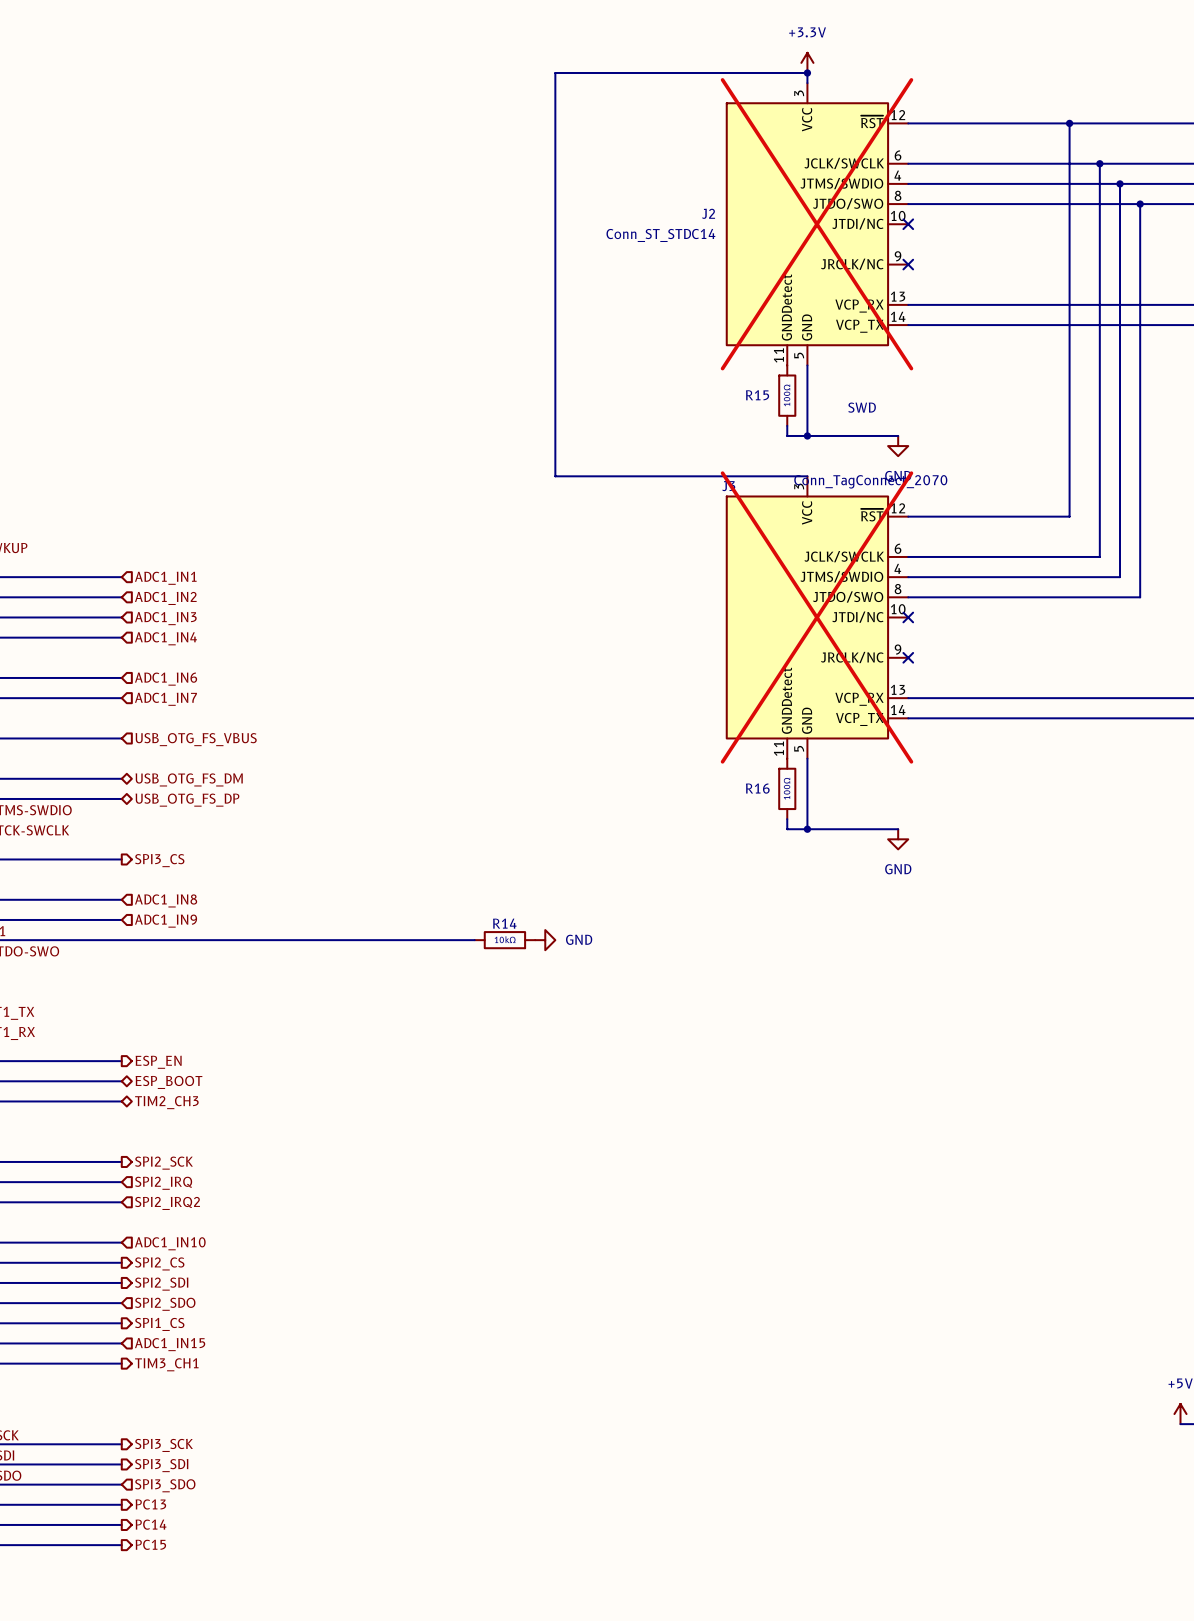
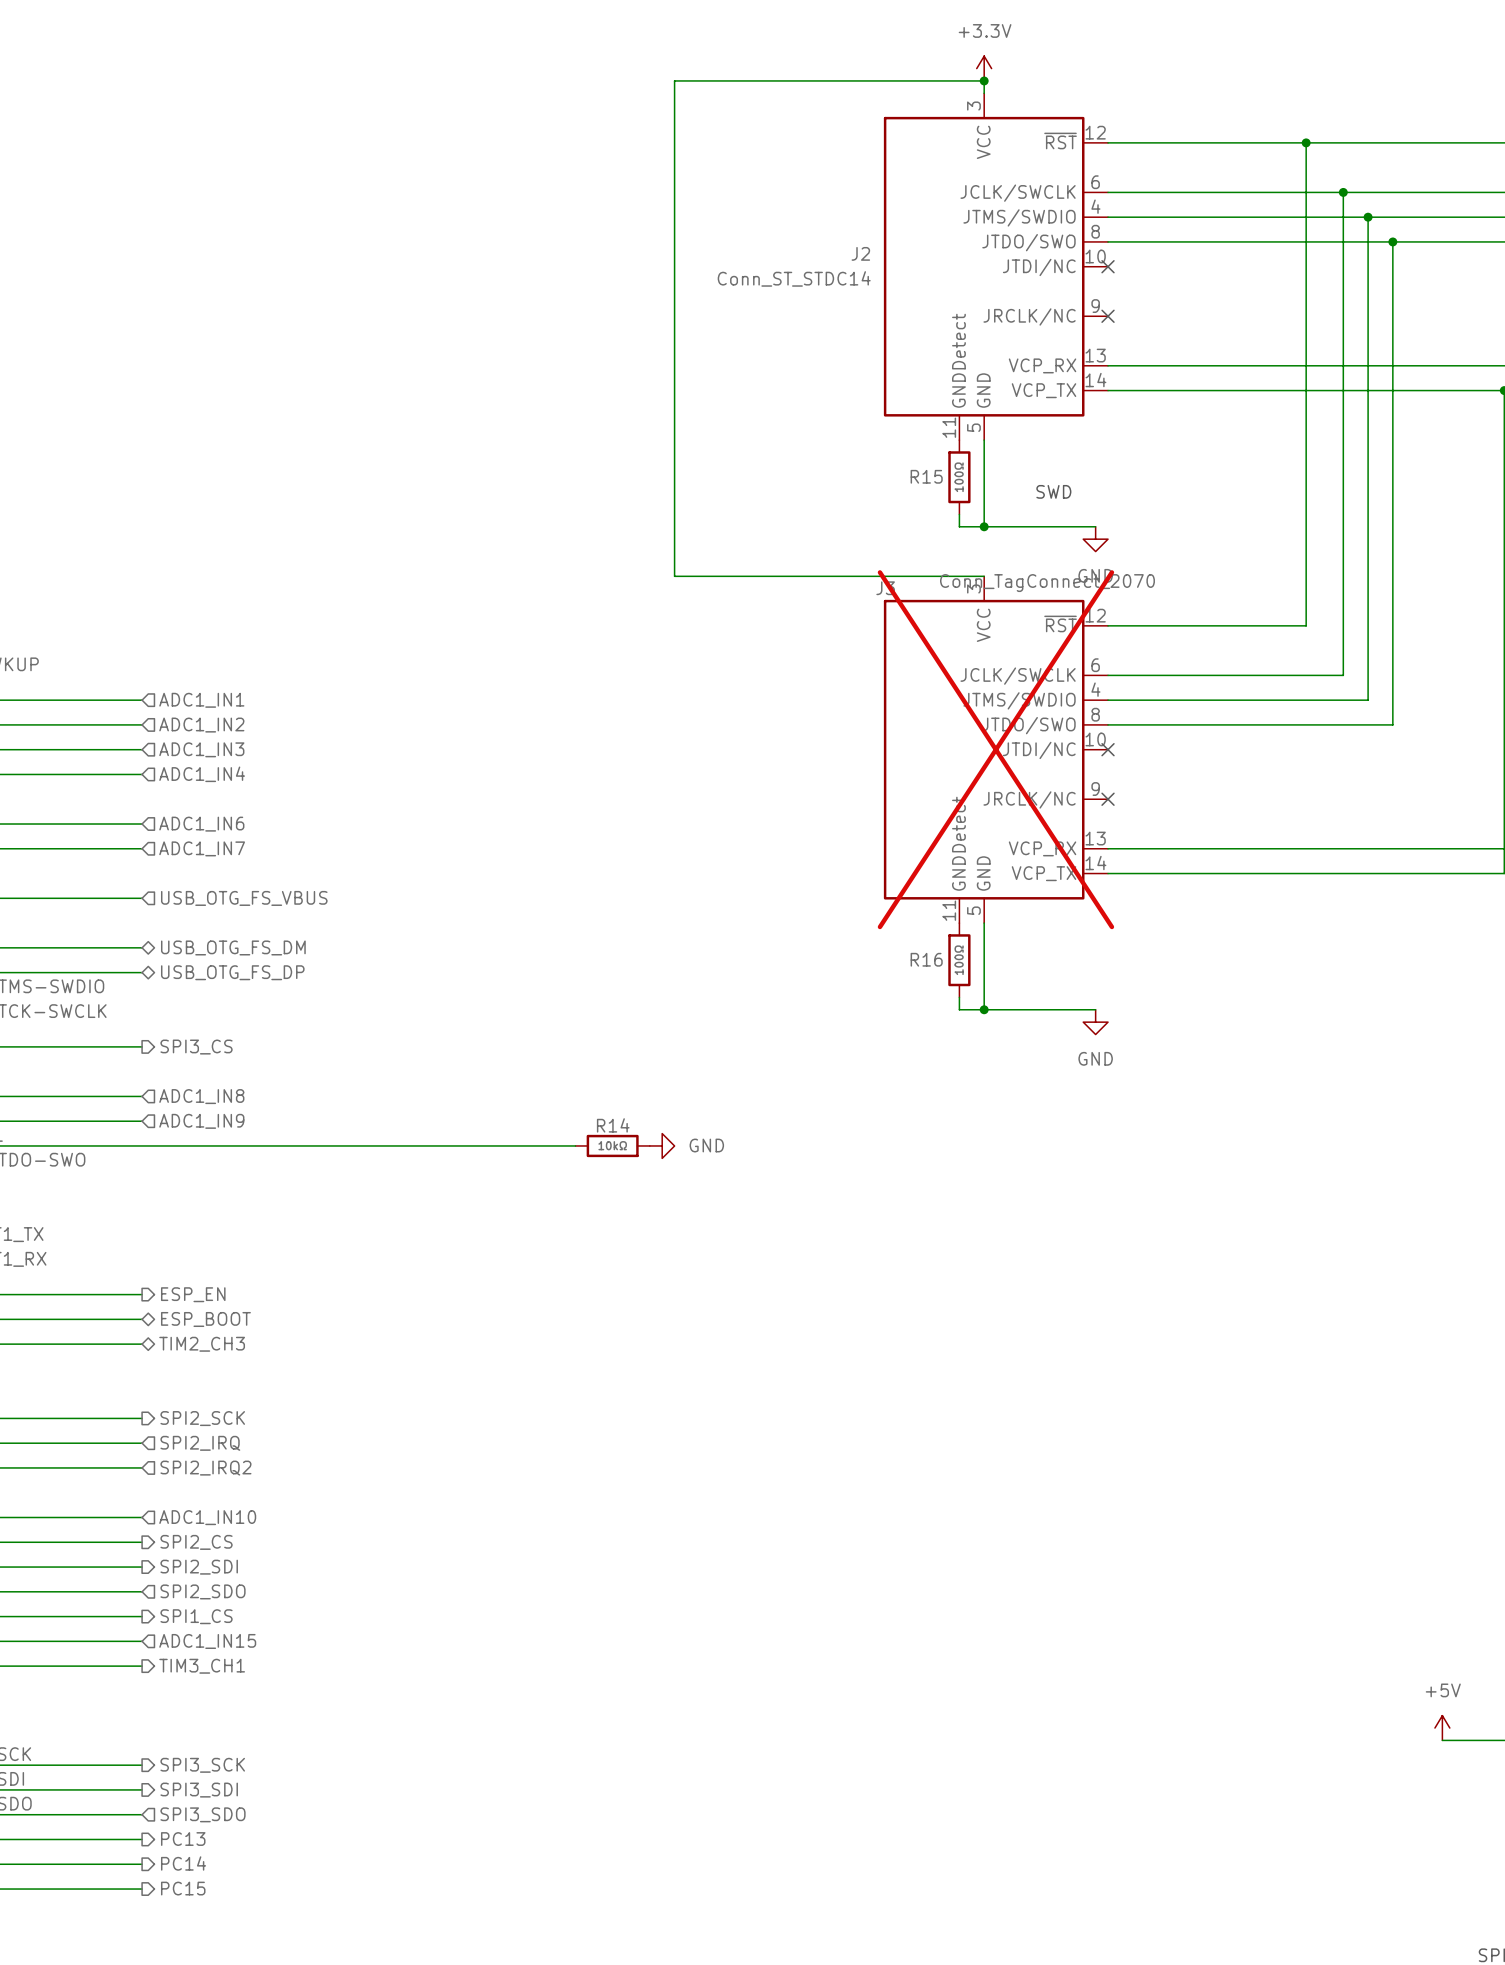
J2 do-not-place cross: (817, 224) -> none

